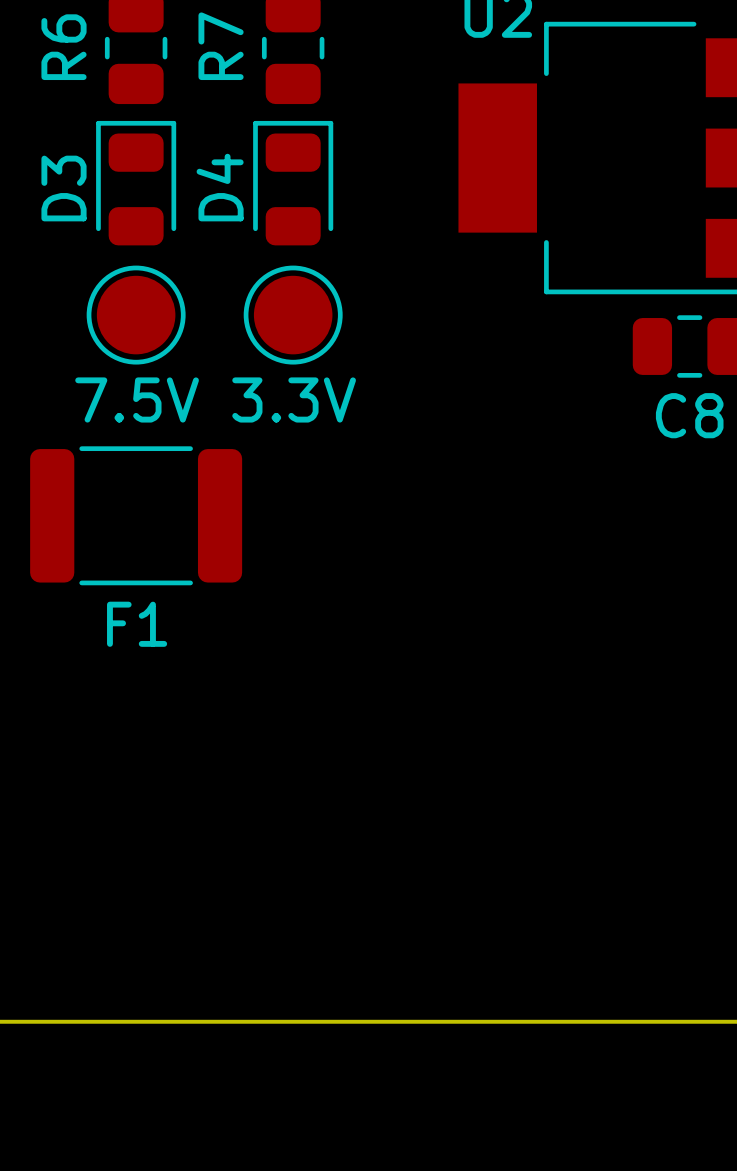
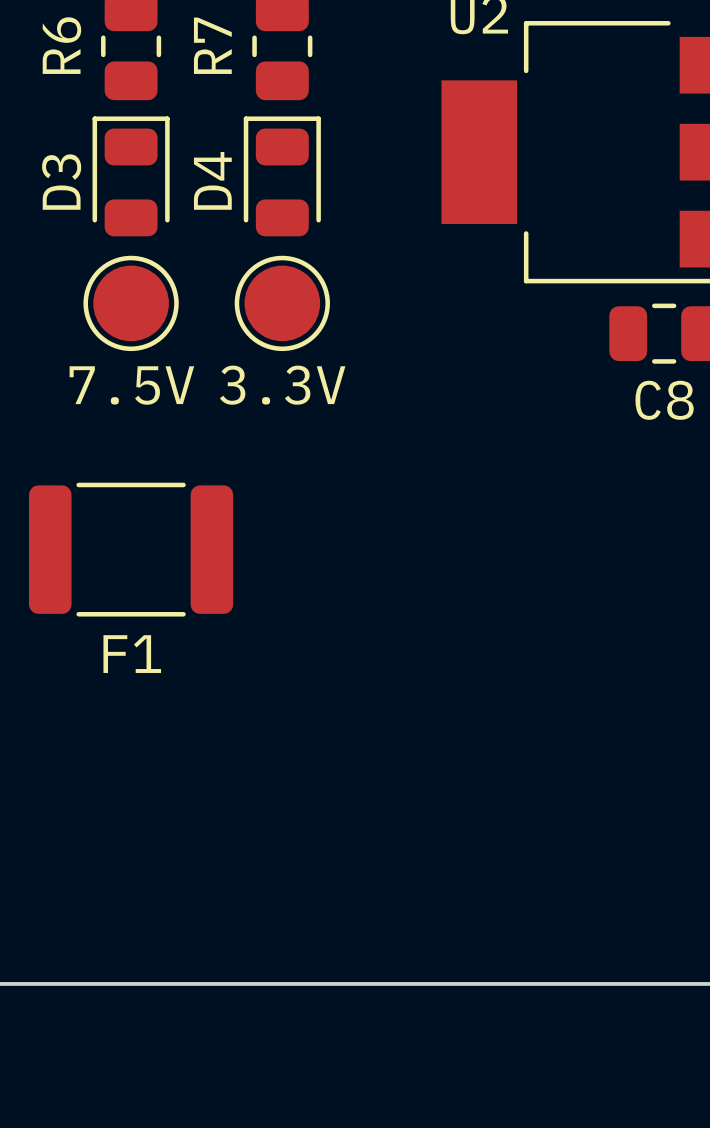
F1 position: (136, 515) -> (131, 549)

